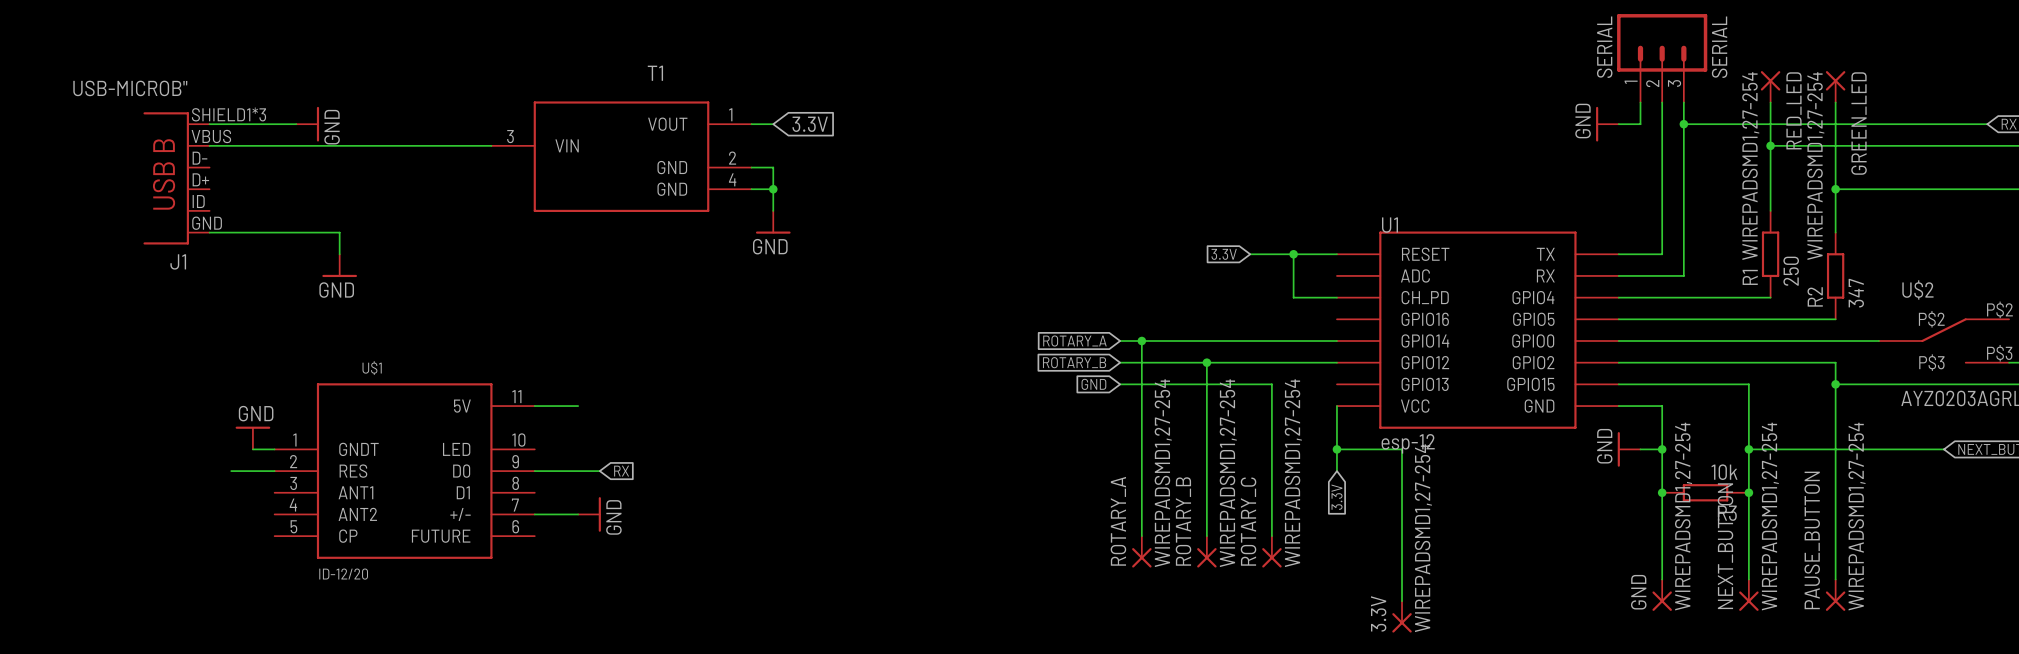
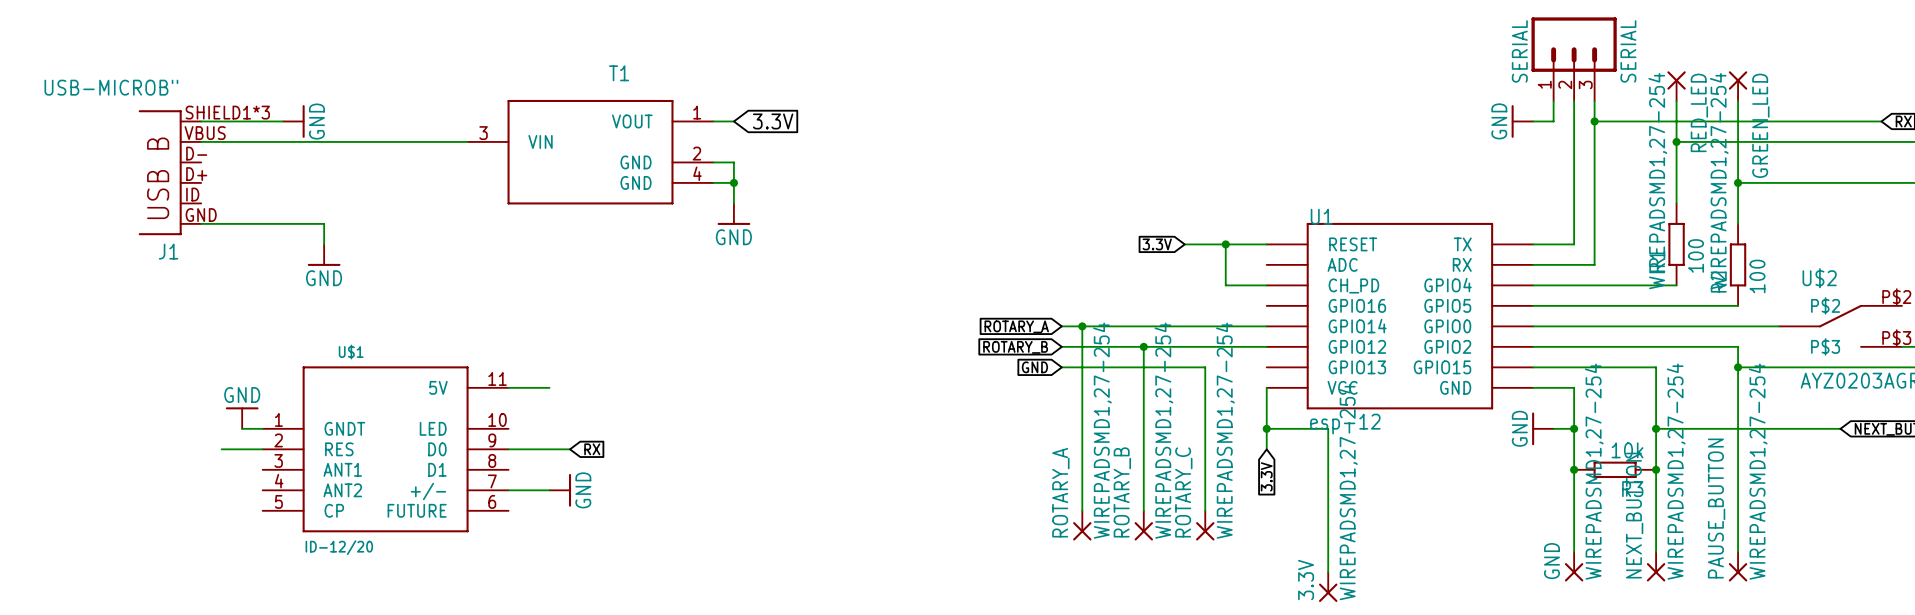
R1 value: 250 (1791, 271) -> 100 (1696, 255)
R2 value: 347 (1856, 293) -> 100 (1757, 276)

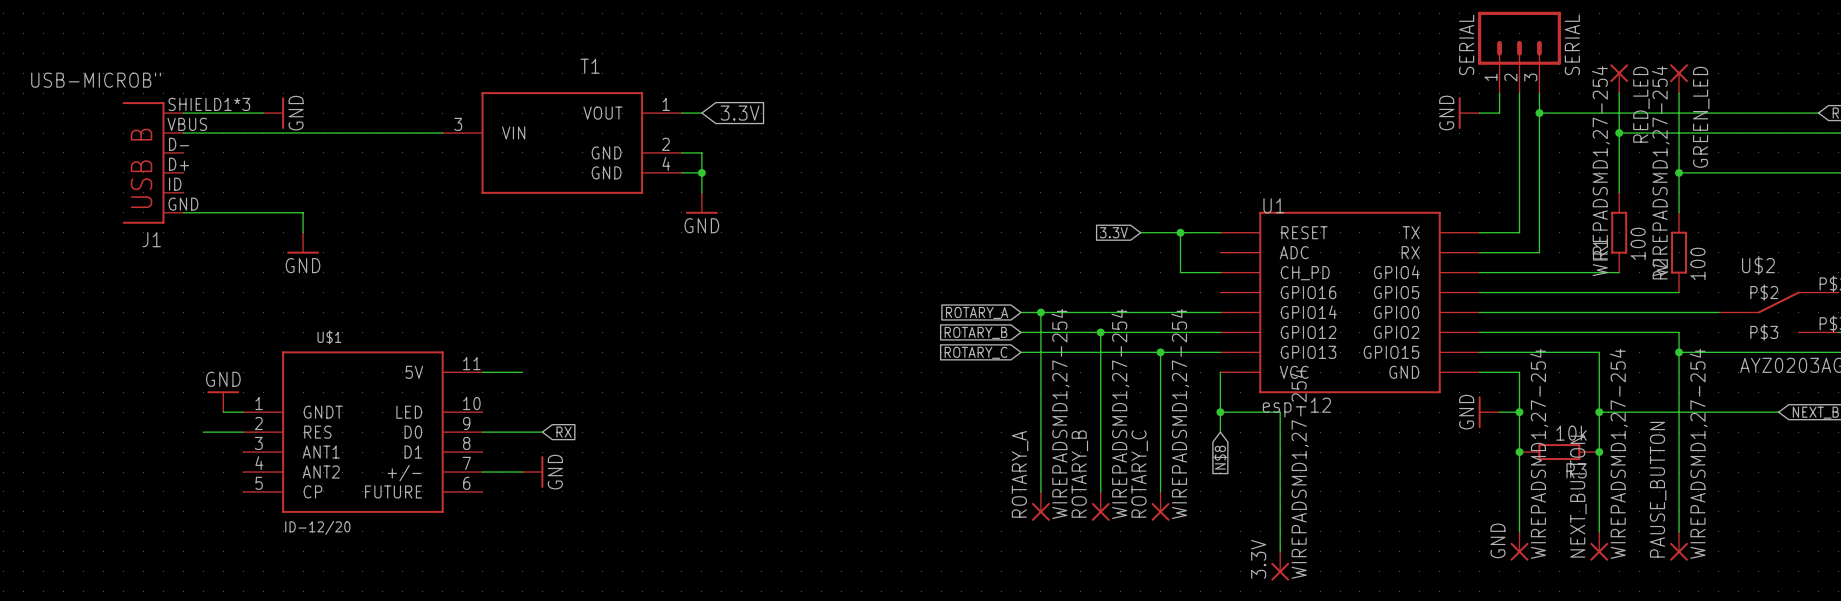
global label: GND (1034, 367) -> ROTARY_C (976, 352)
wire: none -> (1160, 352) (1220, 352)
junction: none -> (1160, 352)
global label: 3.3V (1266, 476) -> N$8 (1220, 457)

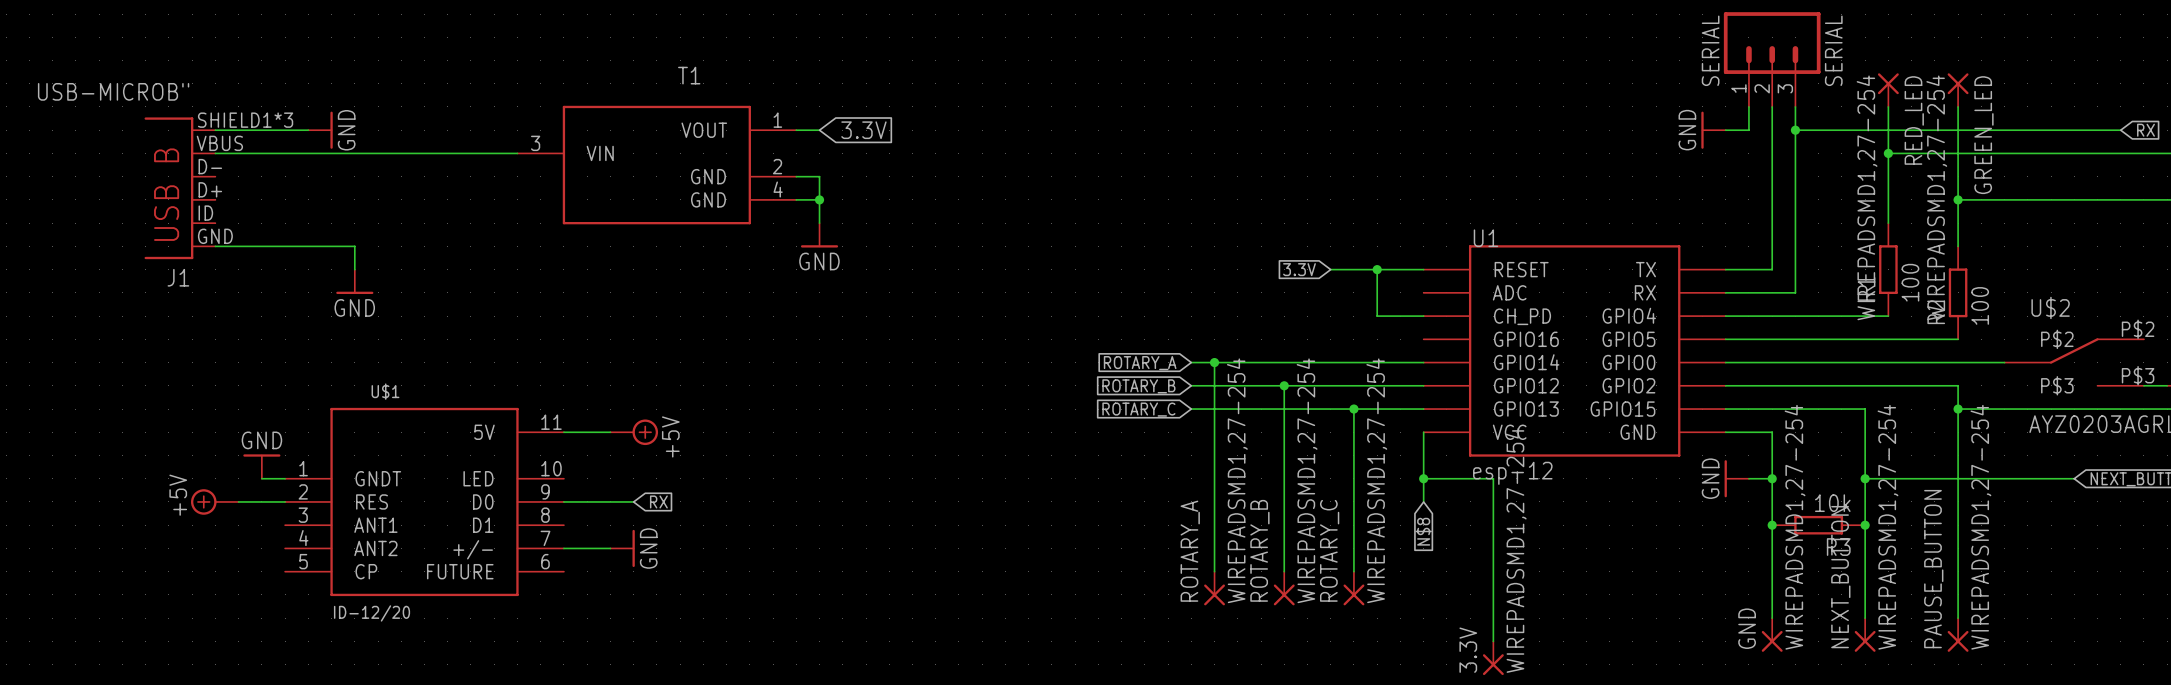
power symbol: none -> +5V (634, 432)
power symbol: none -> +5V (214, 501)

